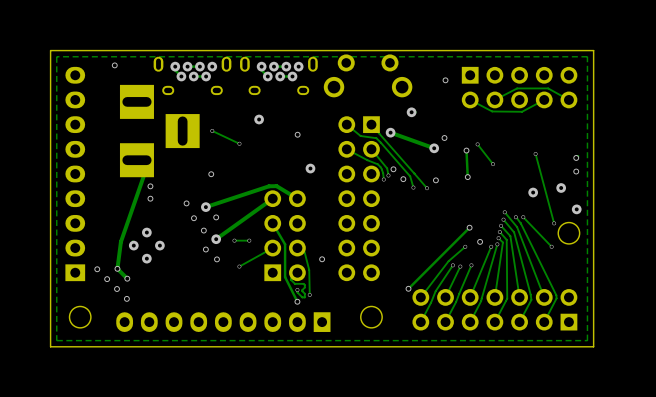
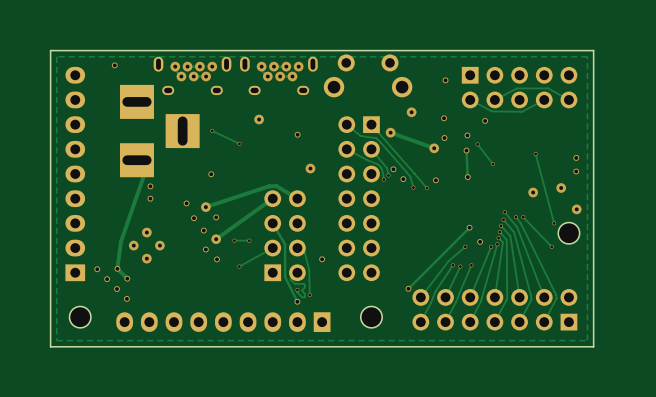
via: none -> (444, 118)
via: none -> (485, 120)
via: none -> (467, 135)

